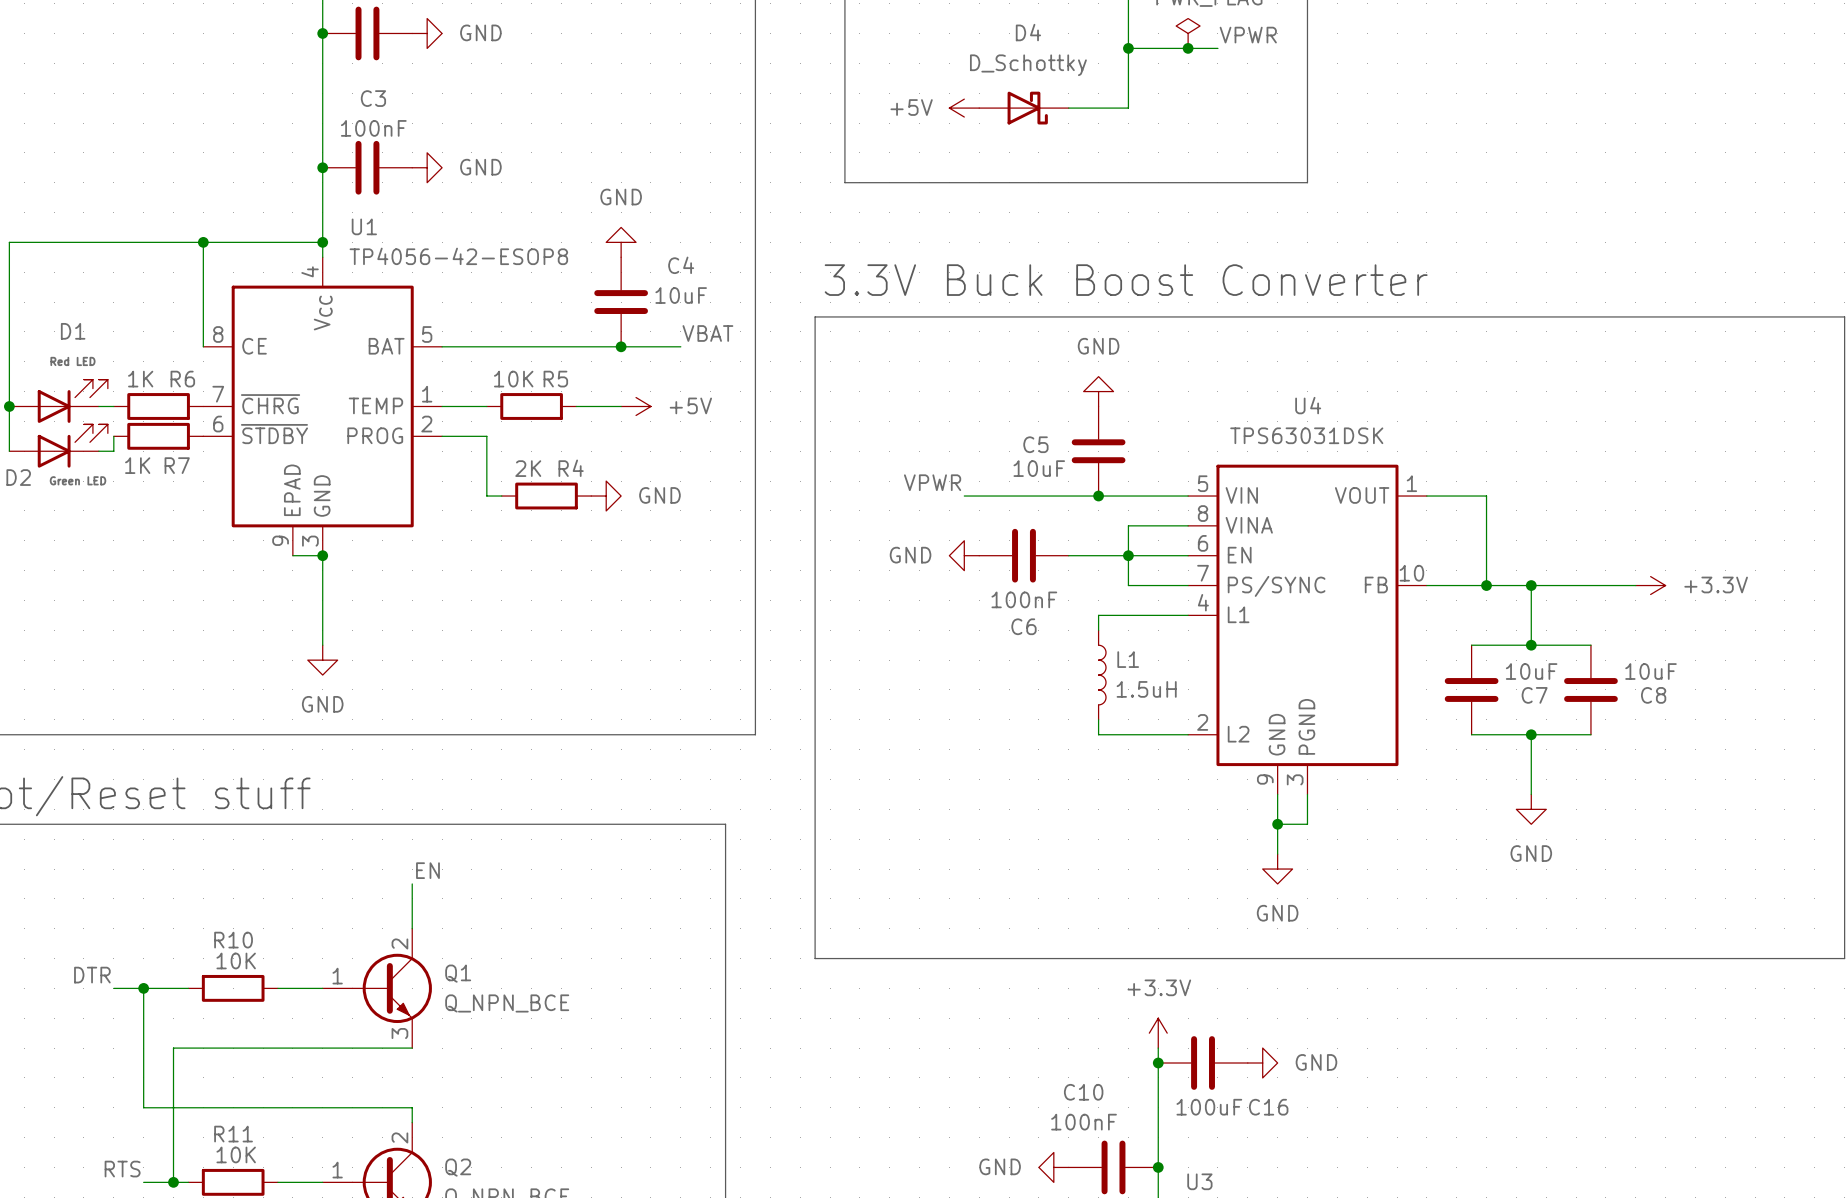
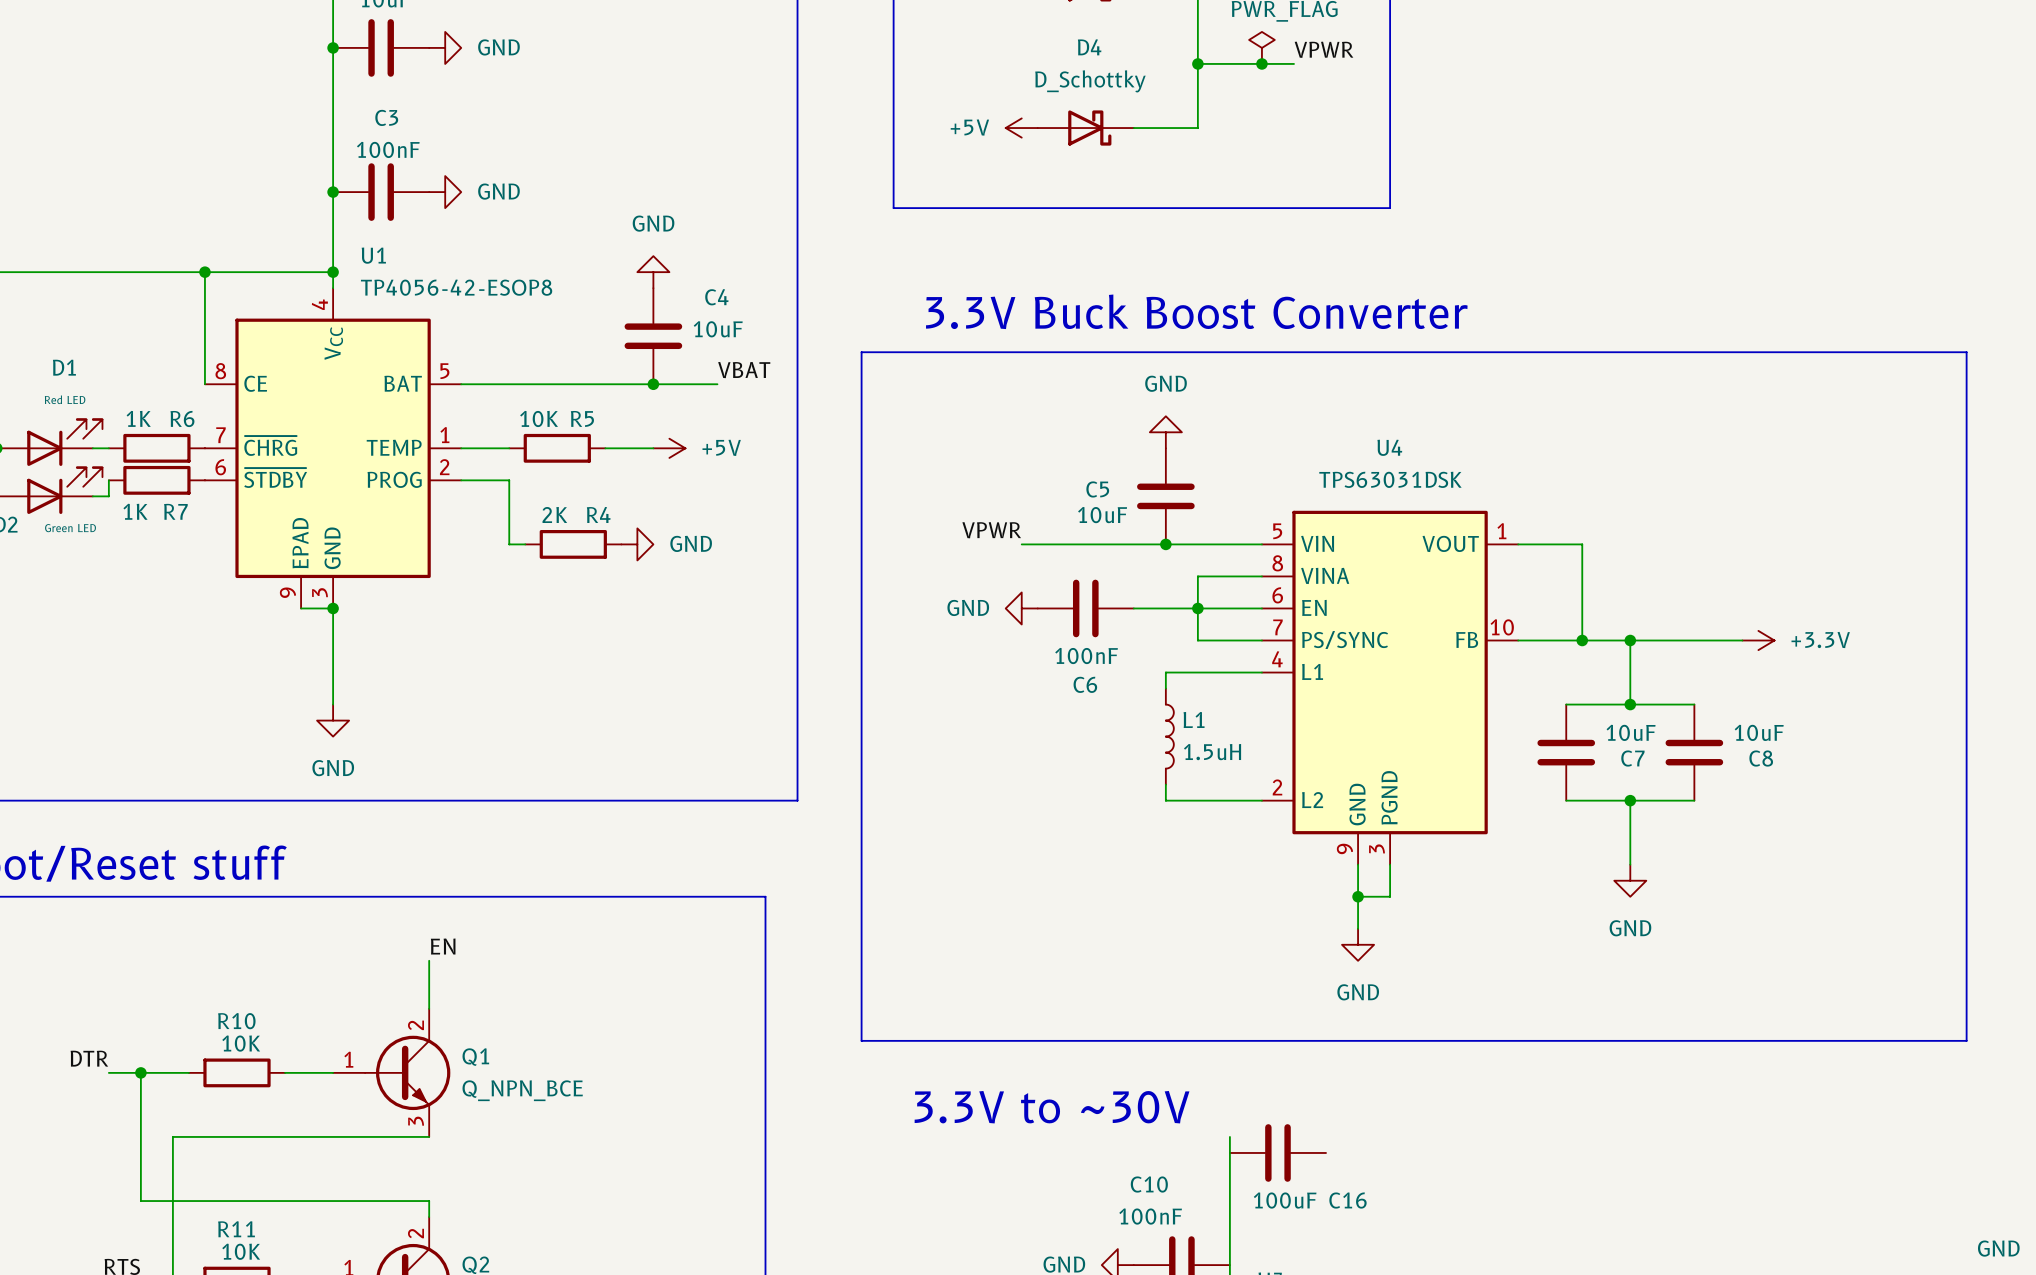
text: none -> 3.3V to ~30V (1052, 1107)
power symbol: +3.3V (1158, 1033) -> none
junction: (1158, 1063) -> none
power symbol: GND (1262, 1063) -> none
junction: (1158, 1167) -> none

